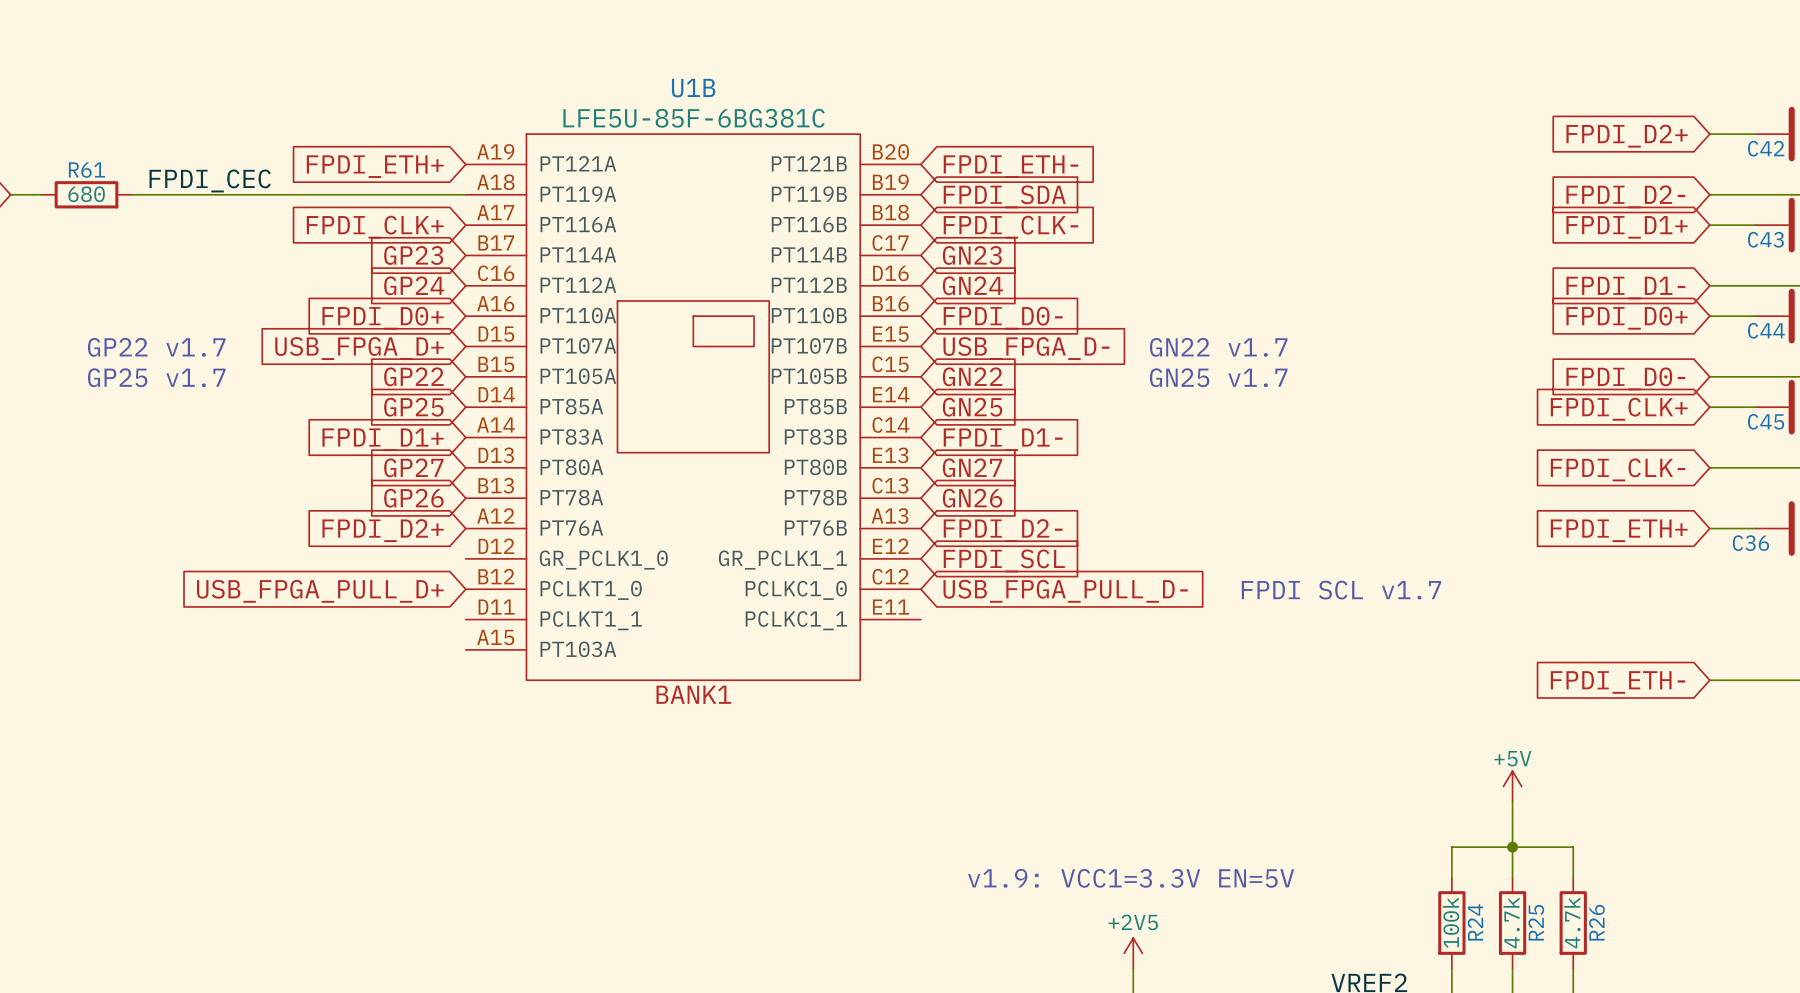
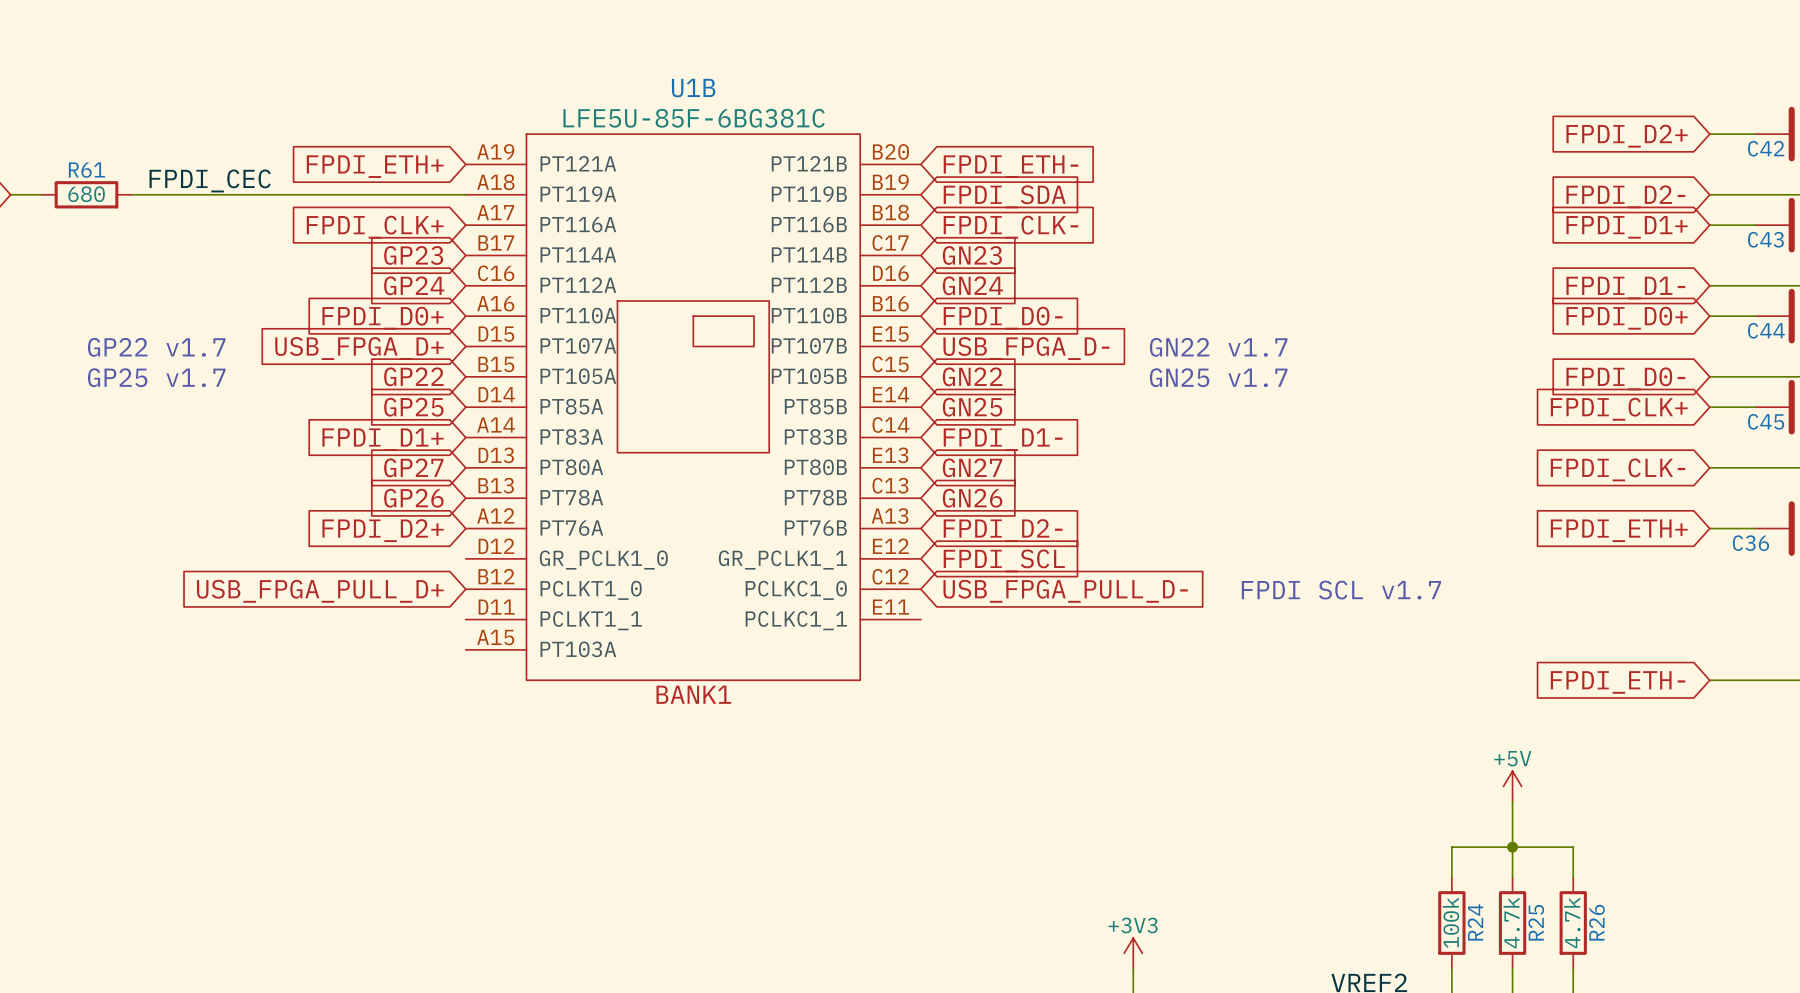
text: v1.9: VCC1=3.3V EN=5V (1131, 878) -> none
power symbol: +2V5 (1133, 953) -> +3V3 (1133, 953)

